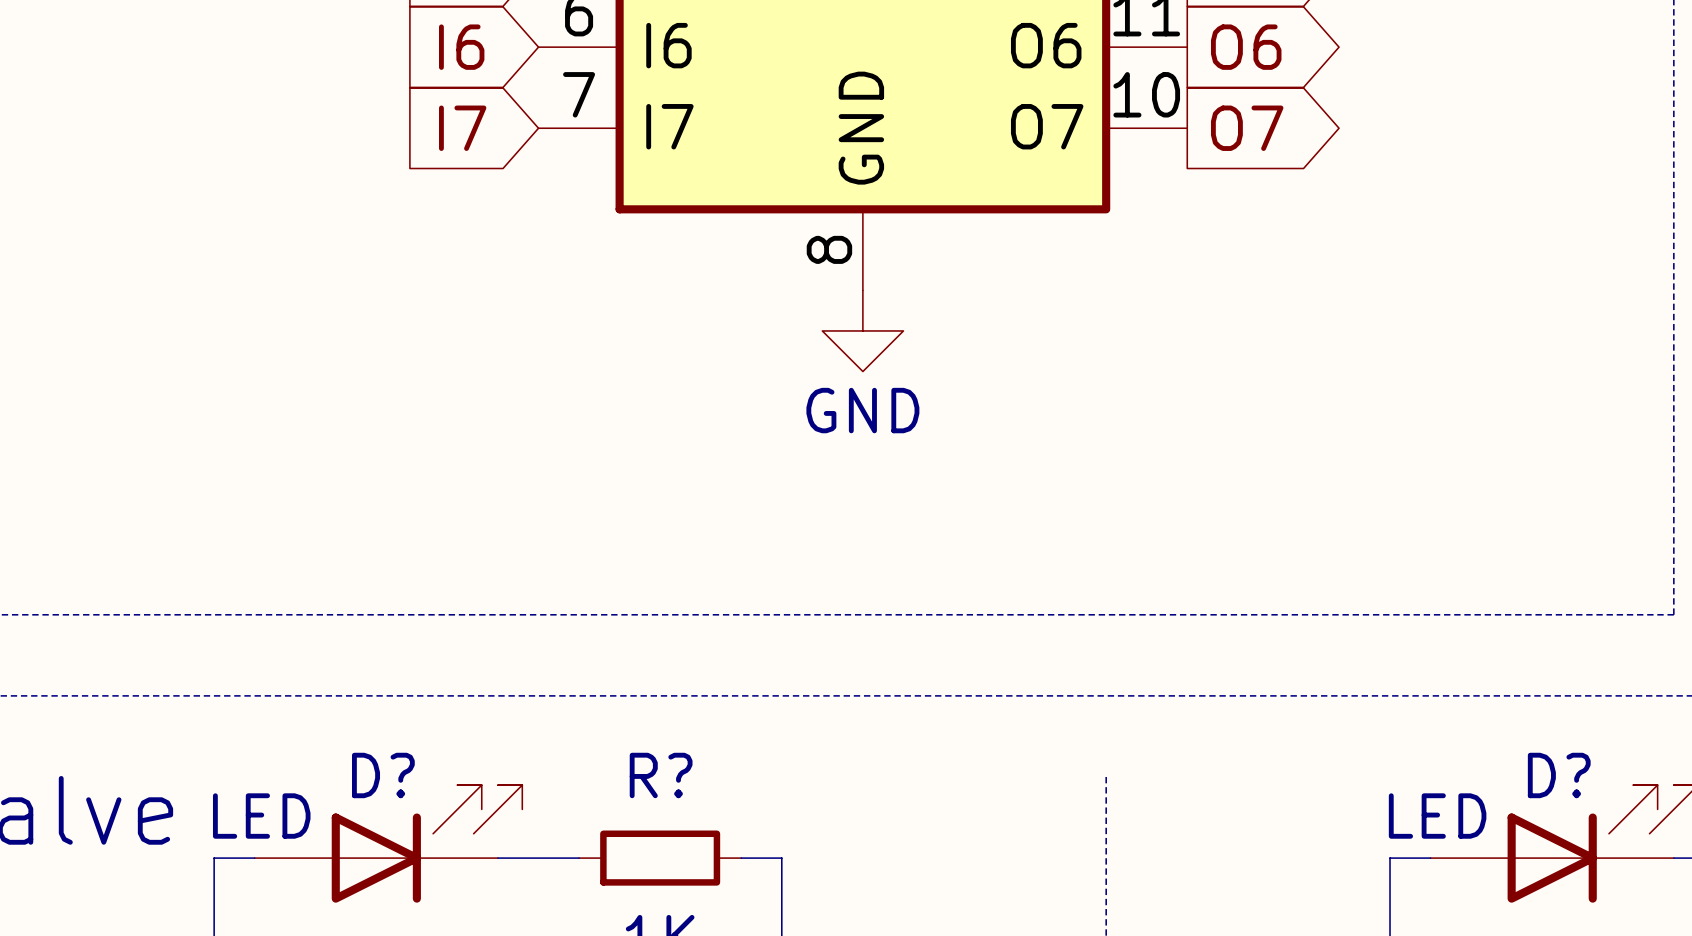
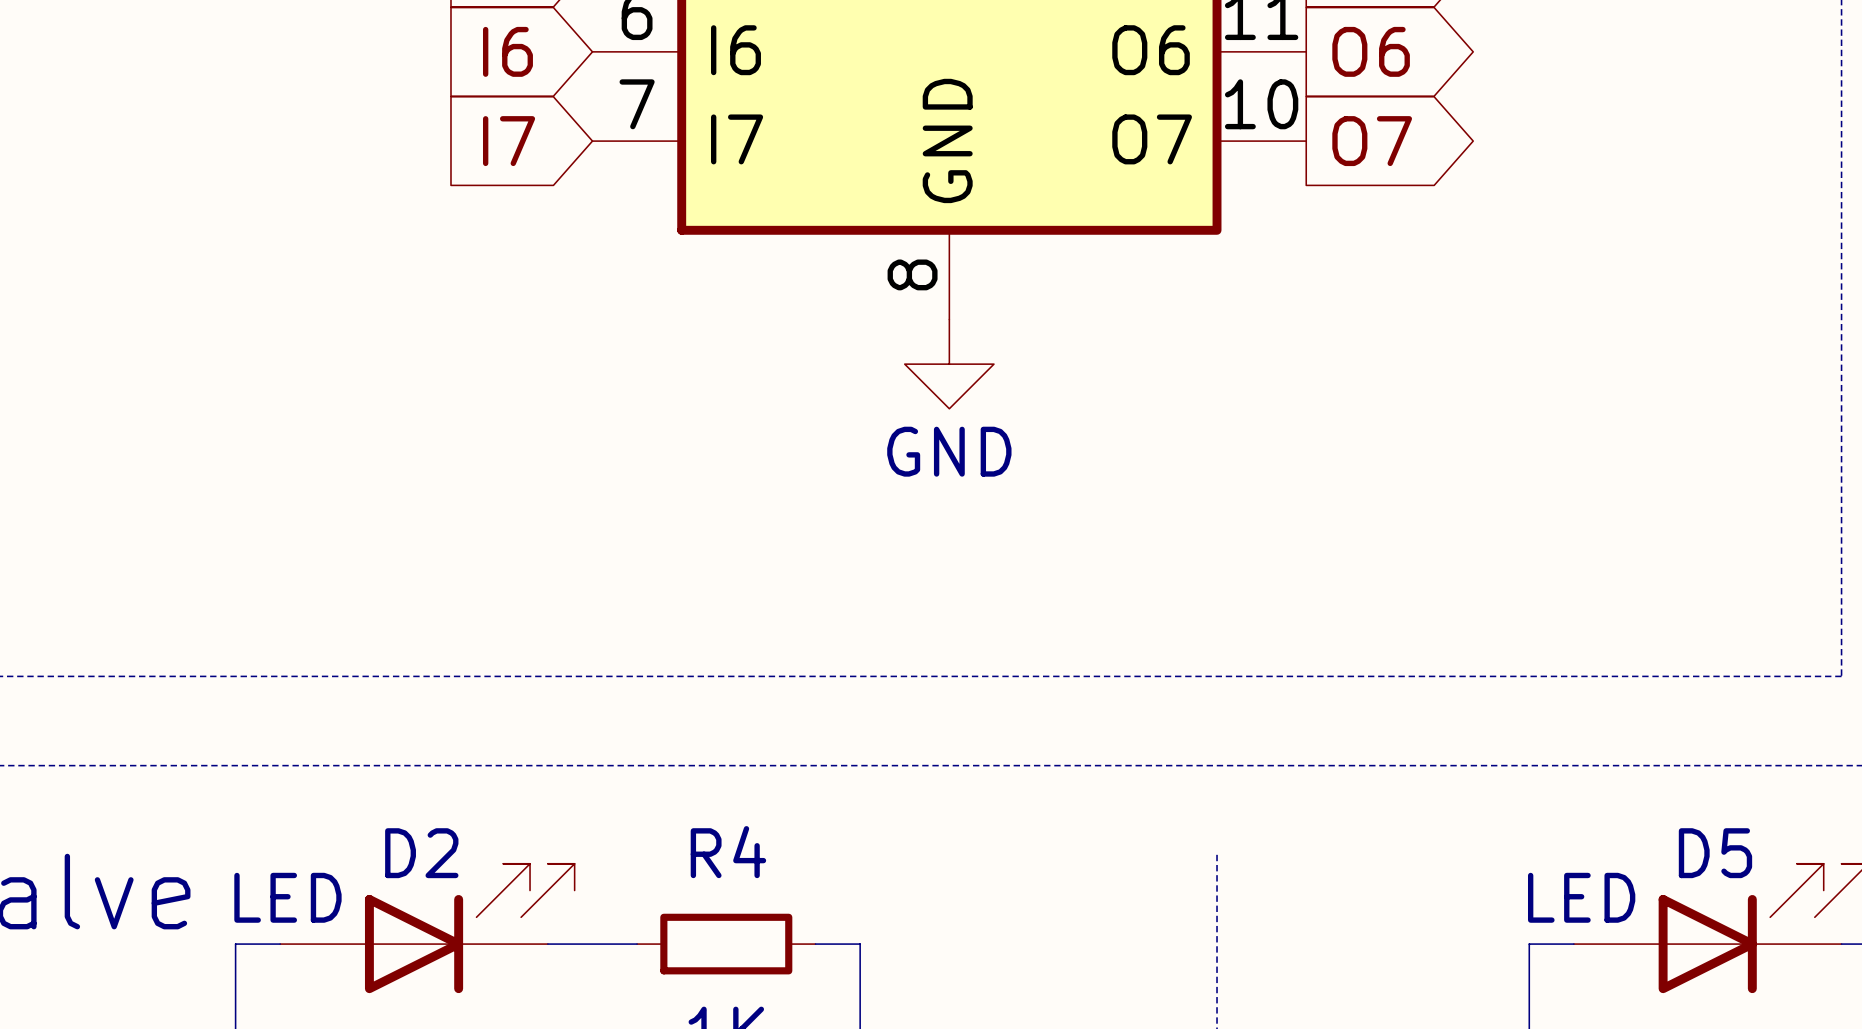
D? name: D? (383, 775) -> D2 (421, 853)
R? name: R? (661, 775) -> R4 (728, 852)
D? name: D? (1559, 775) -> D5 (1715, 853)

